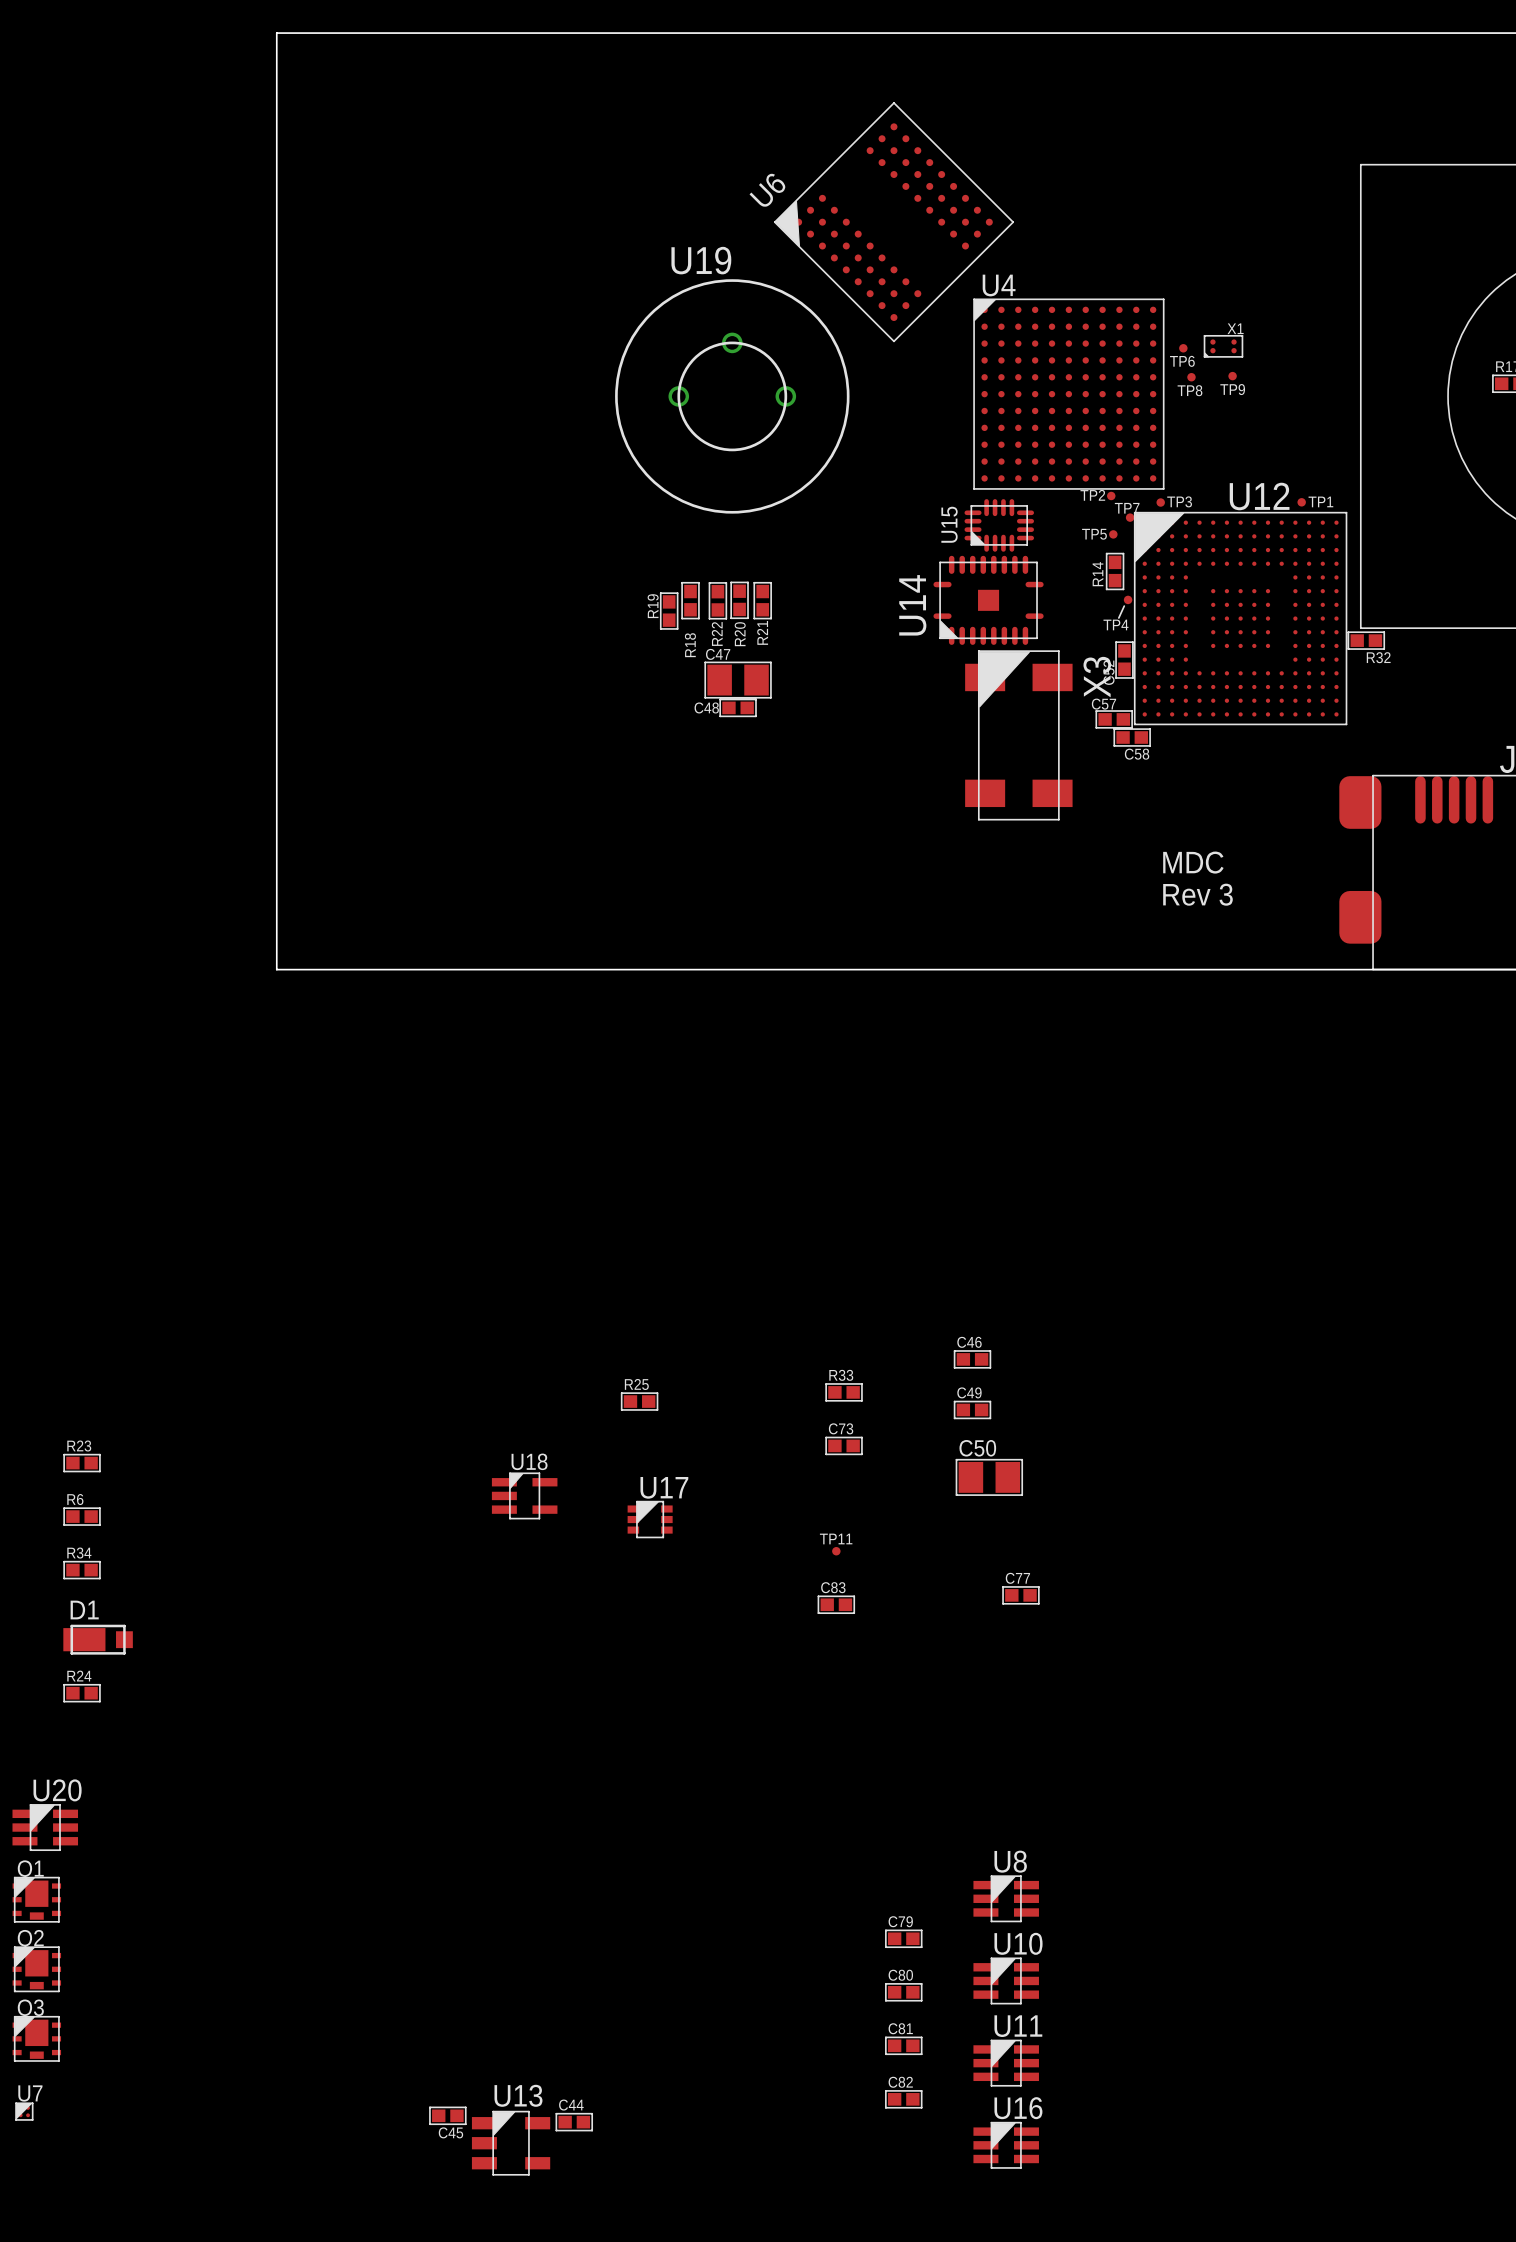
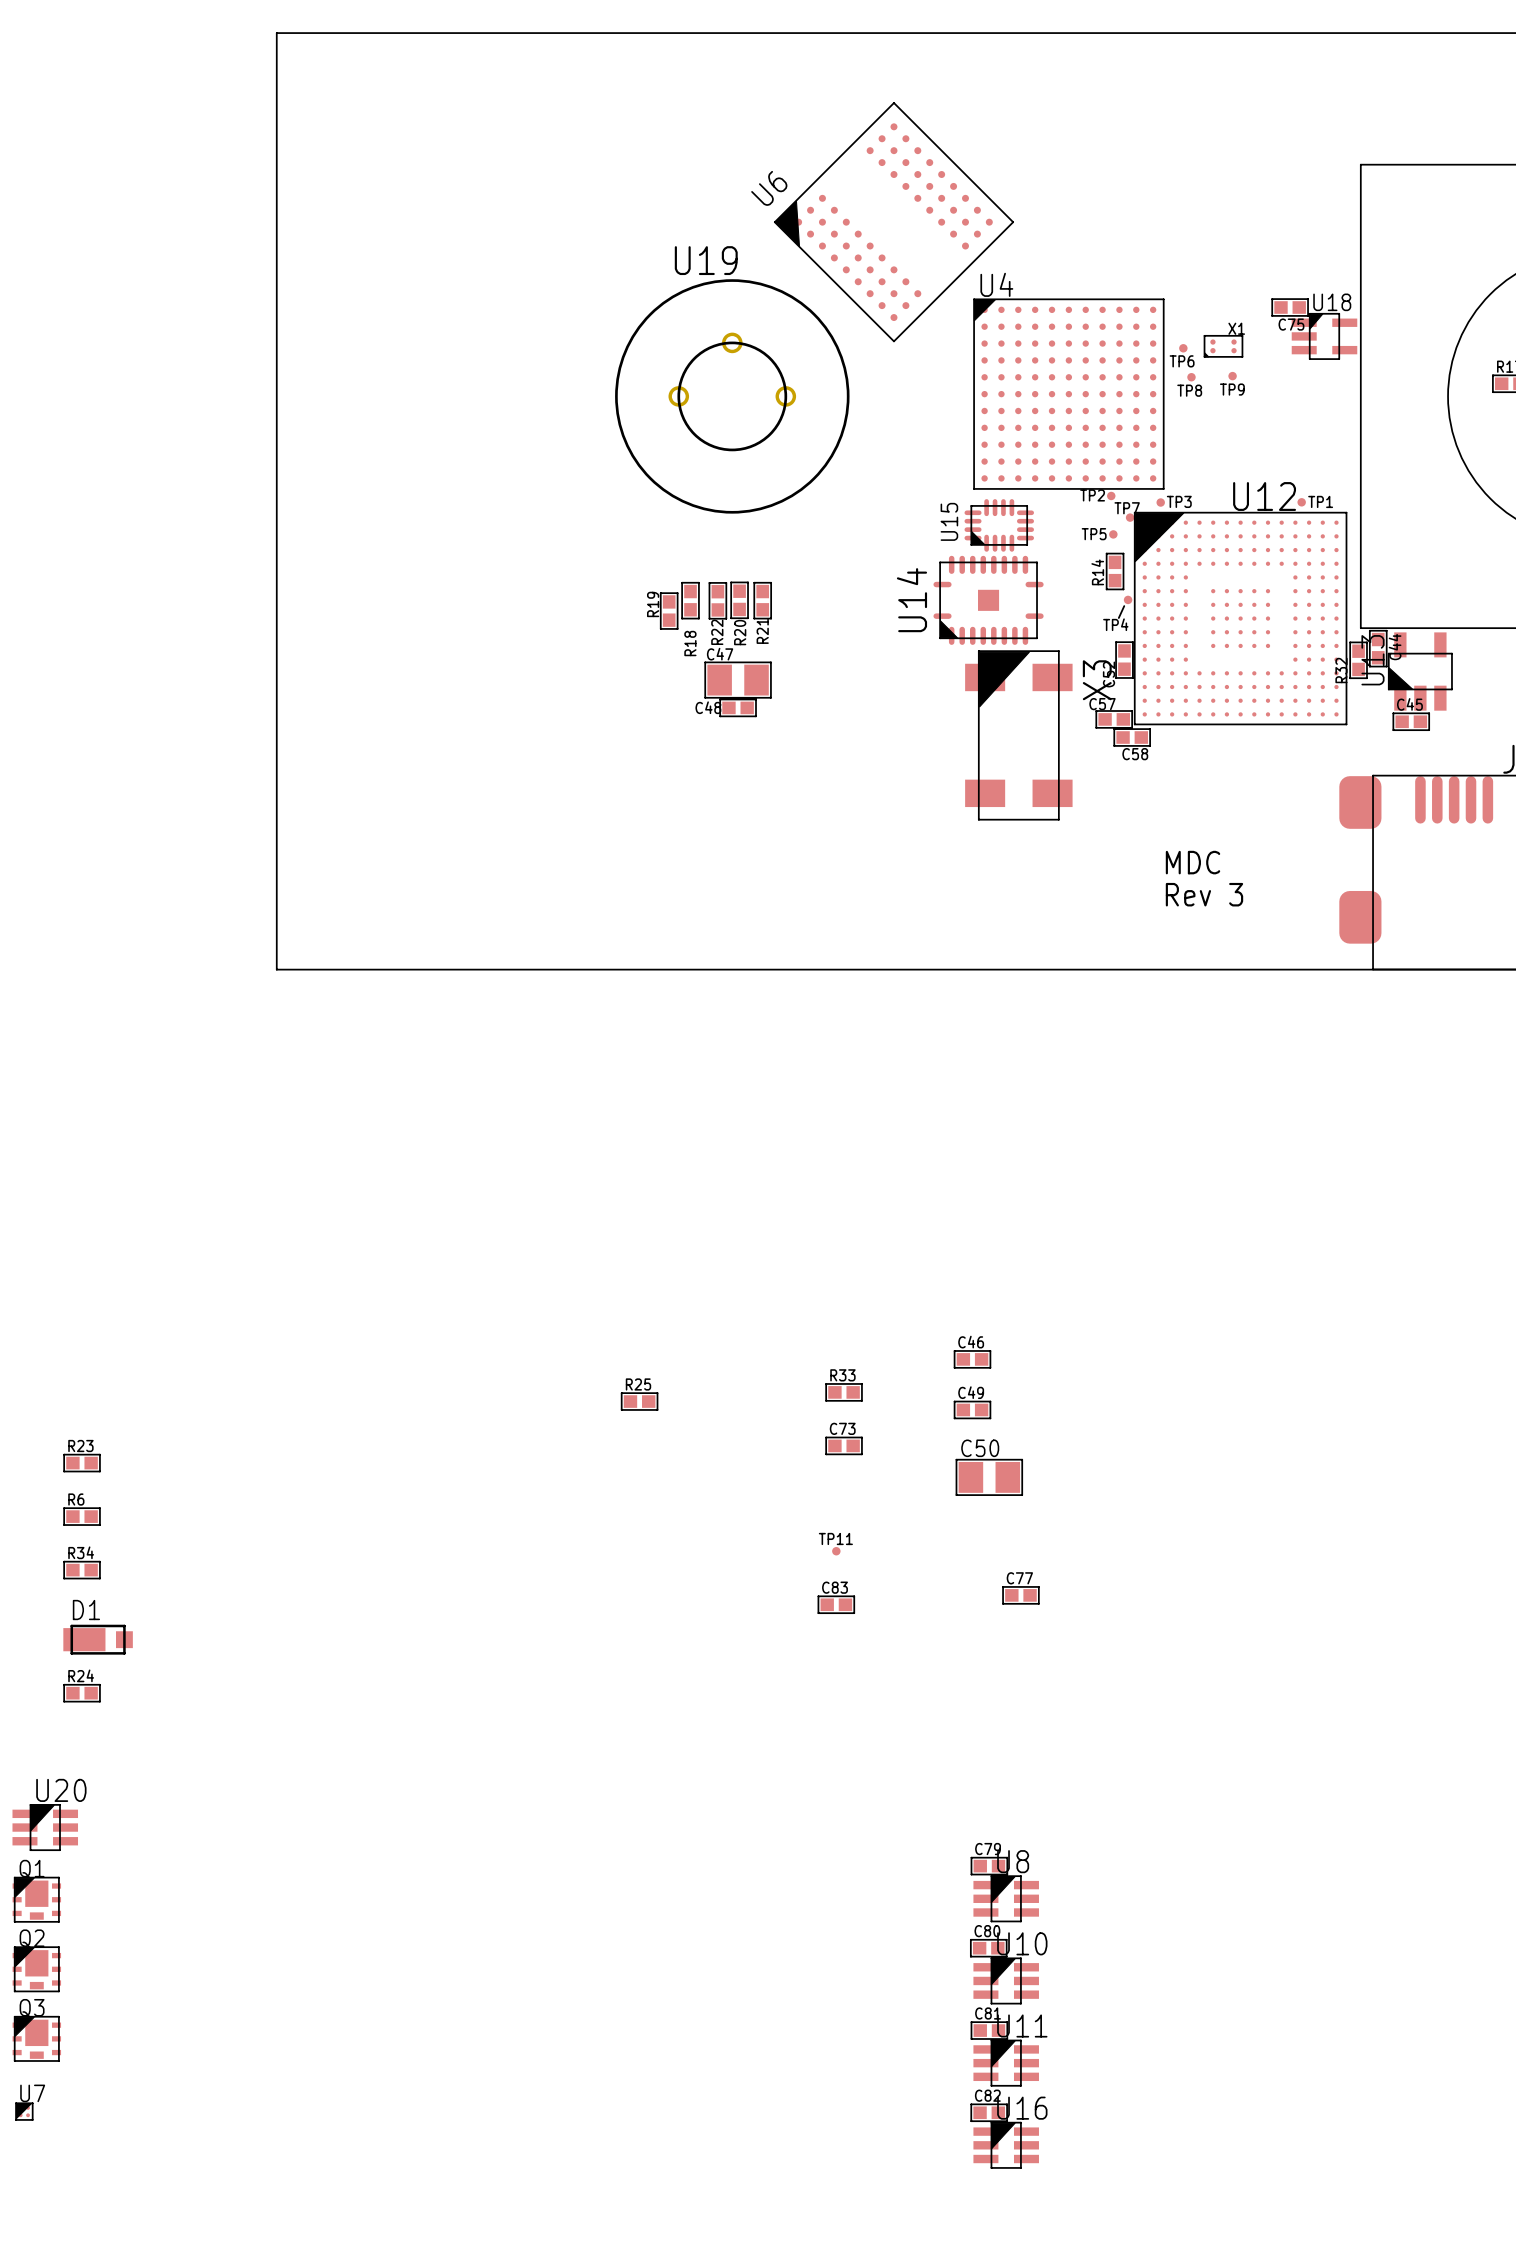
C75: none -> (1290, 307)
R32 rotation: 0° (1366, 640) -> 90° clockwise (1358, 660)
U18 position: (524, 1495) -> (1324, 336)
U17: (650, 1519) -> none
C79 position: (903, 1938) -> (989, 1866)
C80 position: (903, 1992) -> (988, 1948)
C81 position: (903, 2045) -> (989, 2030)
C82 position: (903, 2099) -> (989, 2112)
C45 position: (447, 2115) -> (1411, 721)
C44 rotation: 0° (574, 2122) -> 90° clockwise (1378, 648)
C44 position: (574, 2122) -> (1378, 648)
C45 name position: C45 (450, 2132) -> C45 (1409, 704)
U13 rotation: 0° (511, 2143) -> 90° counterclockwise (1420, 671)
U13 position: (511, 2143) -> (1420, 671)

